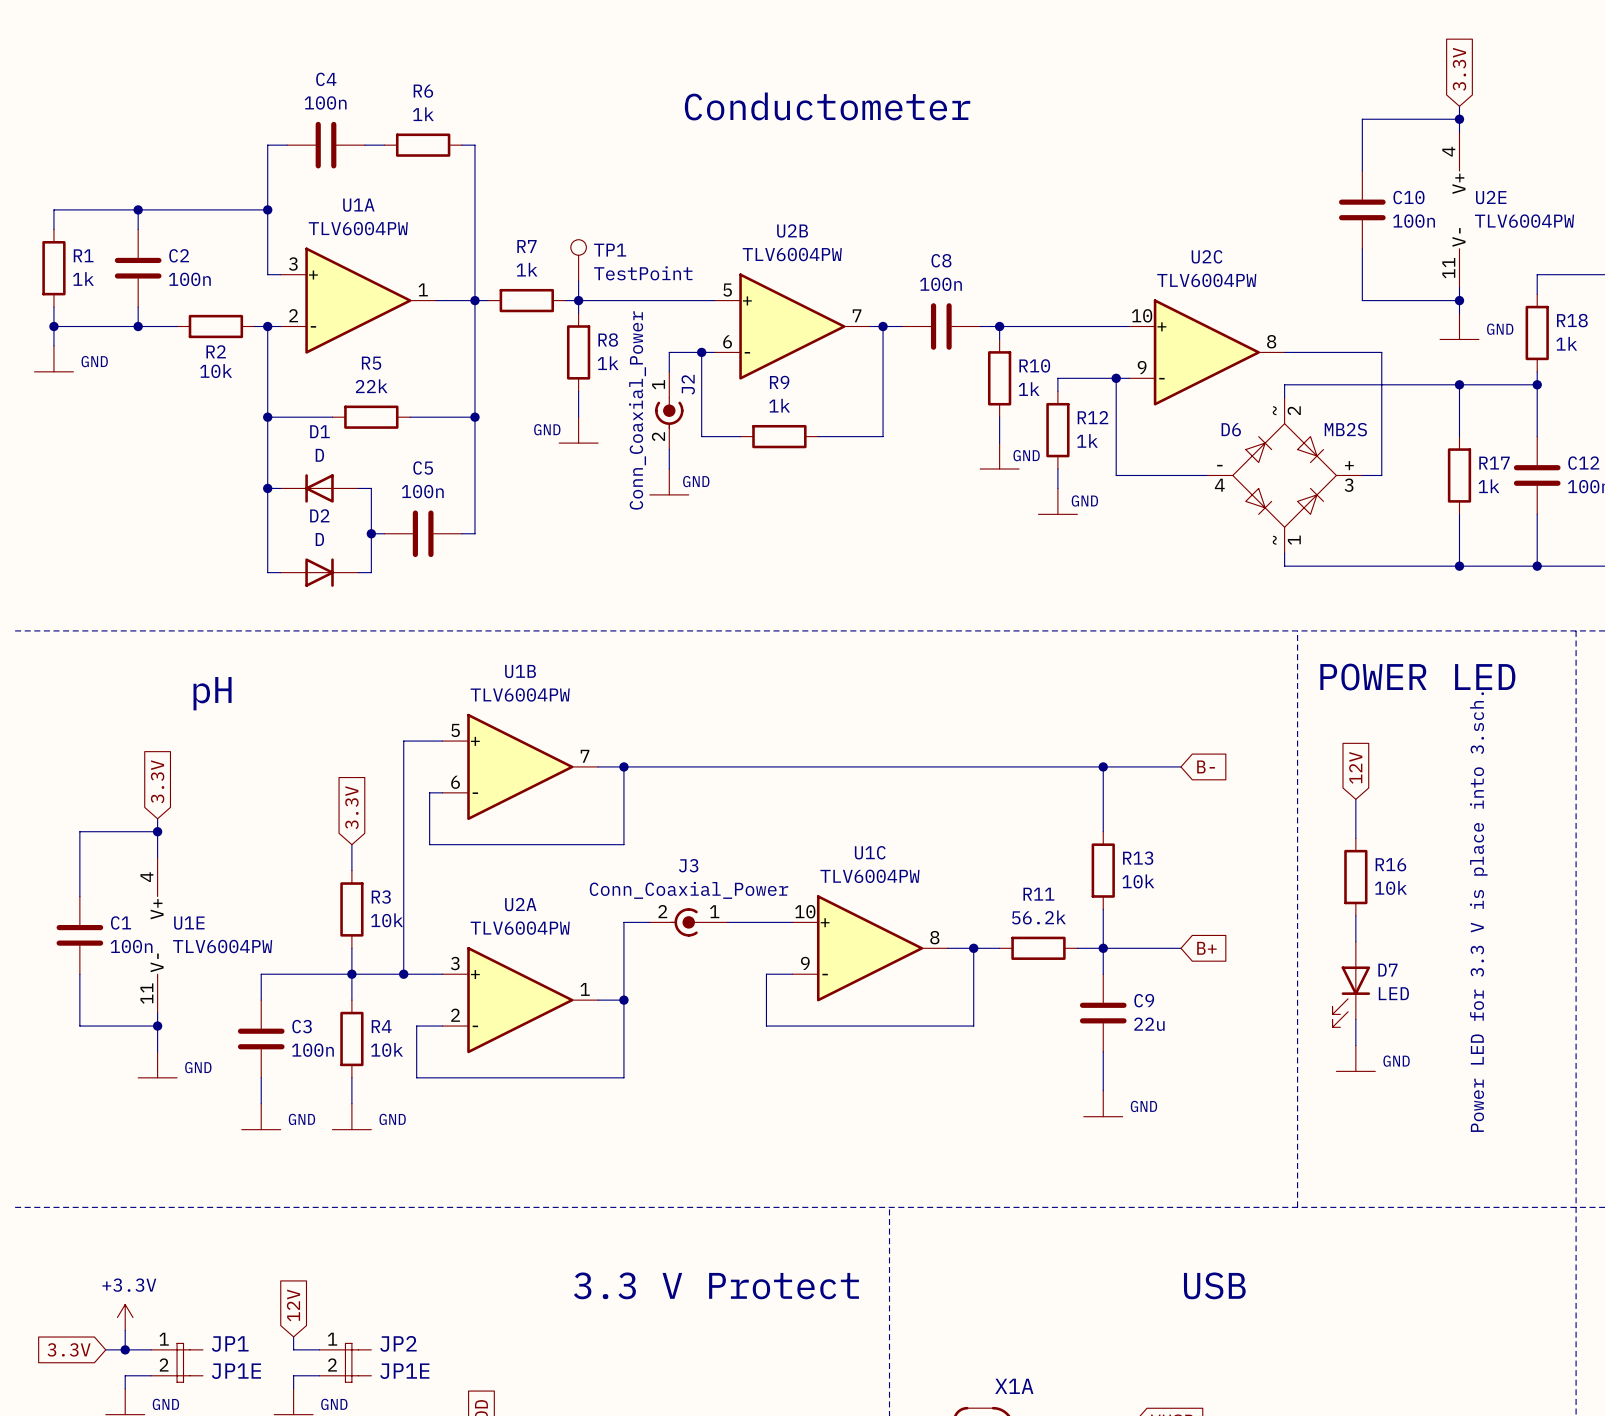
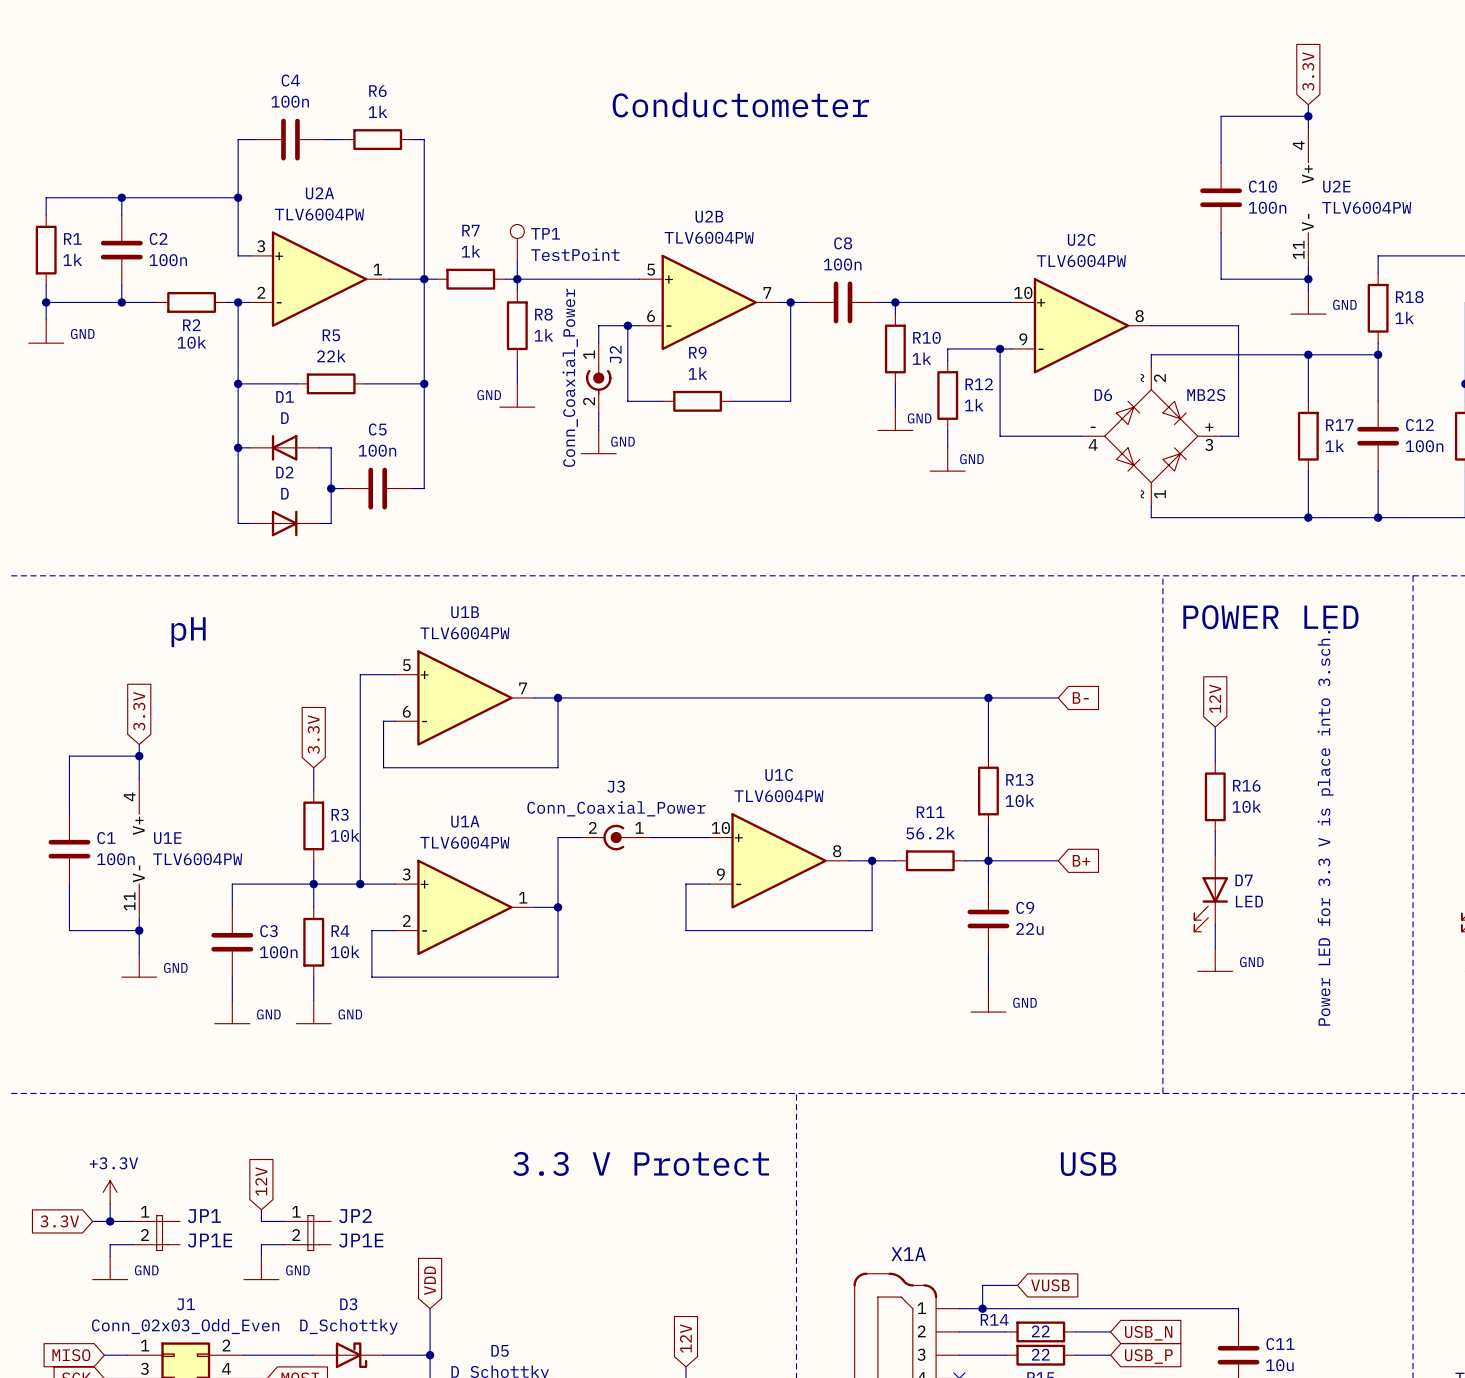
U1A name: U1A (358, 205) -> U2A (319, 193)
U2A name: U2A (520, 904) -> U1A (465, 821)

